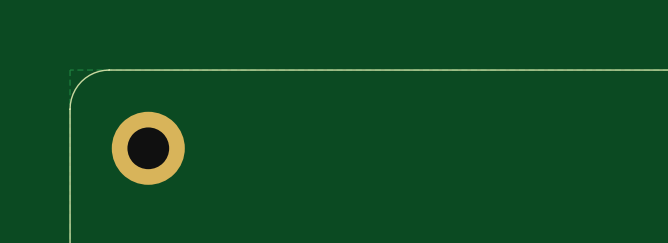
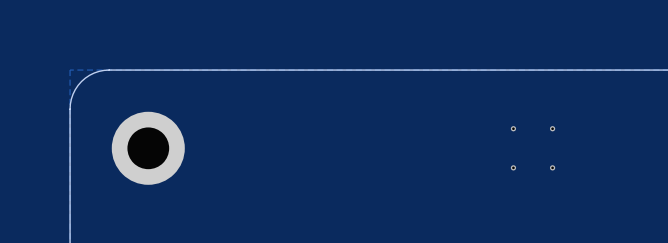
via: none -> (513, 128)
via: none -> (552, 128)
via: none -> (513, 167)
via: none -> (552, 167)

